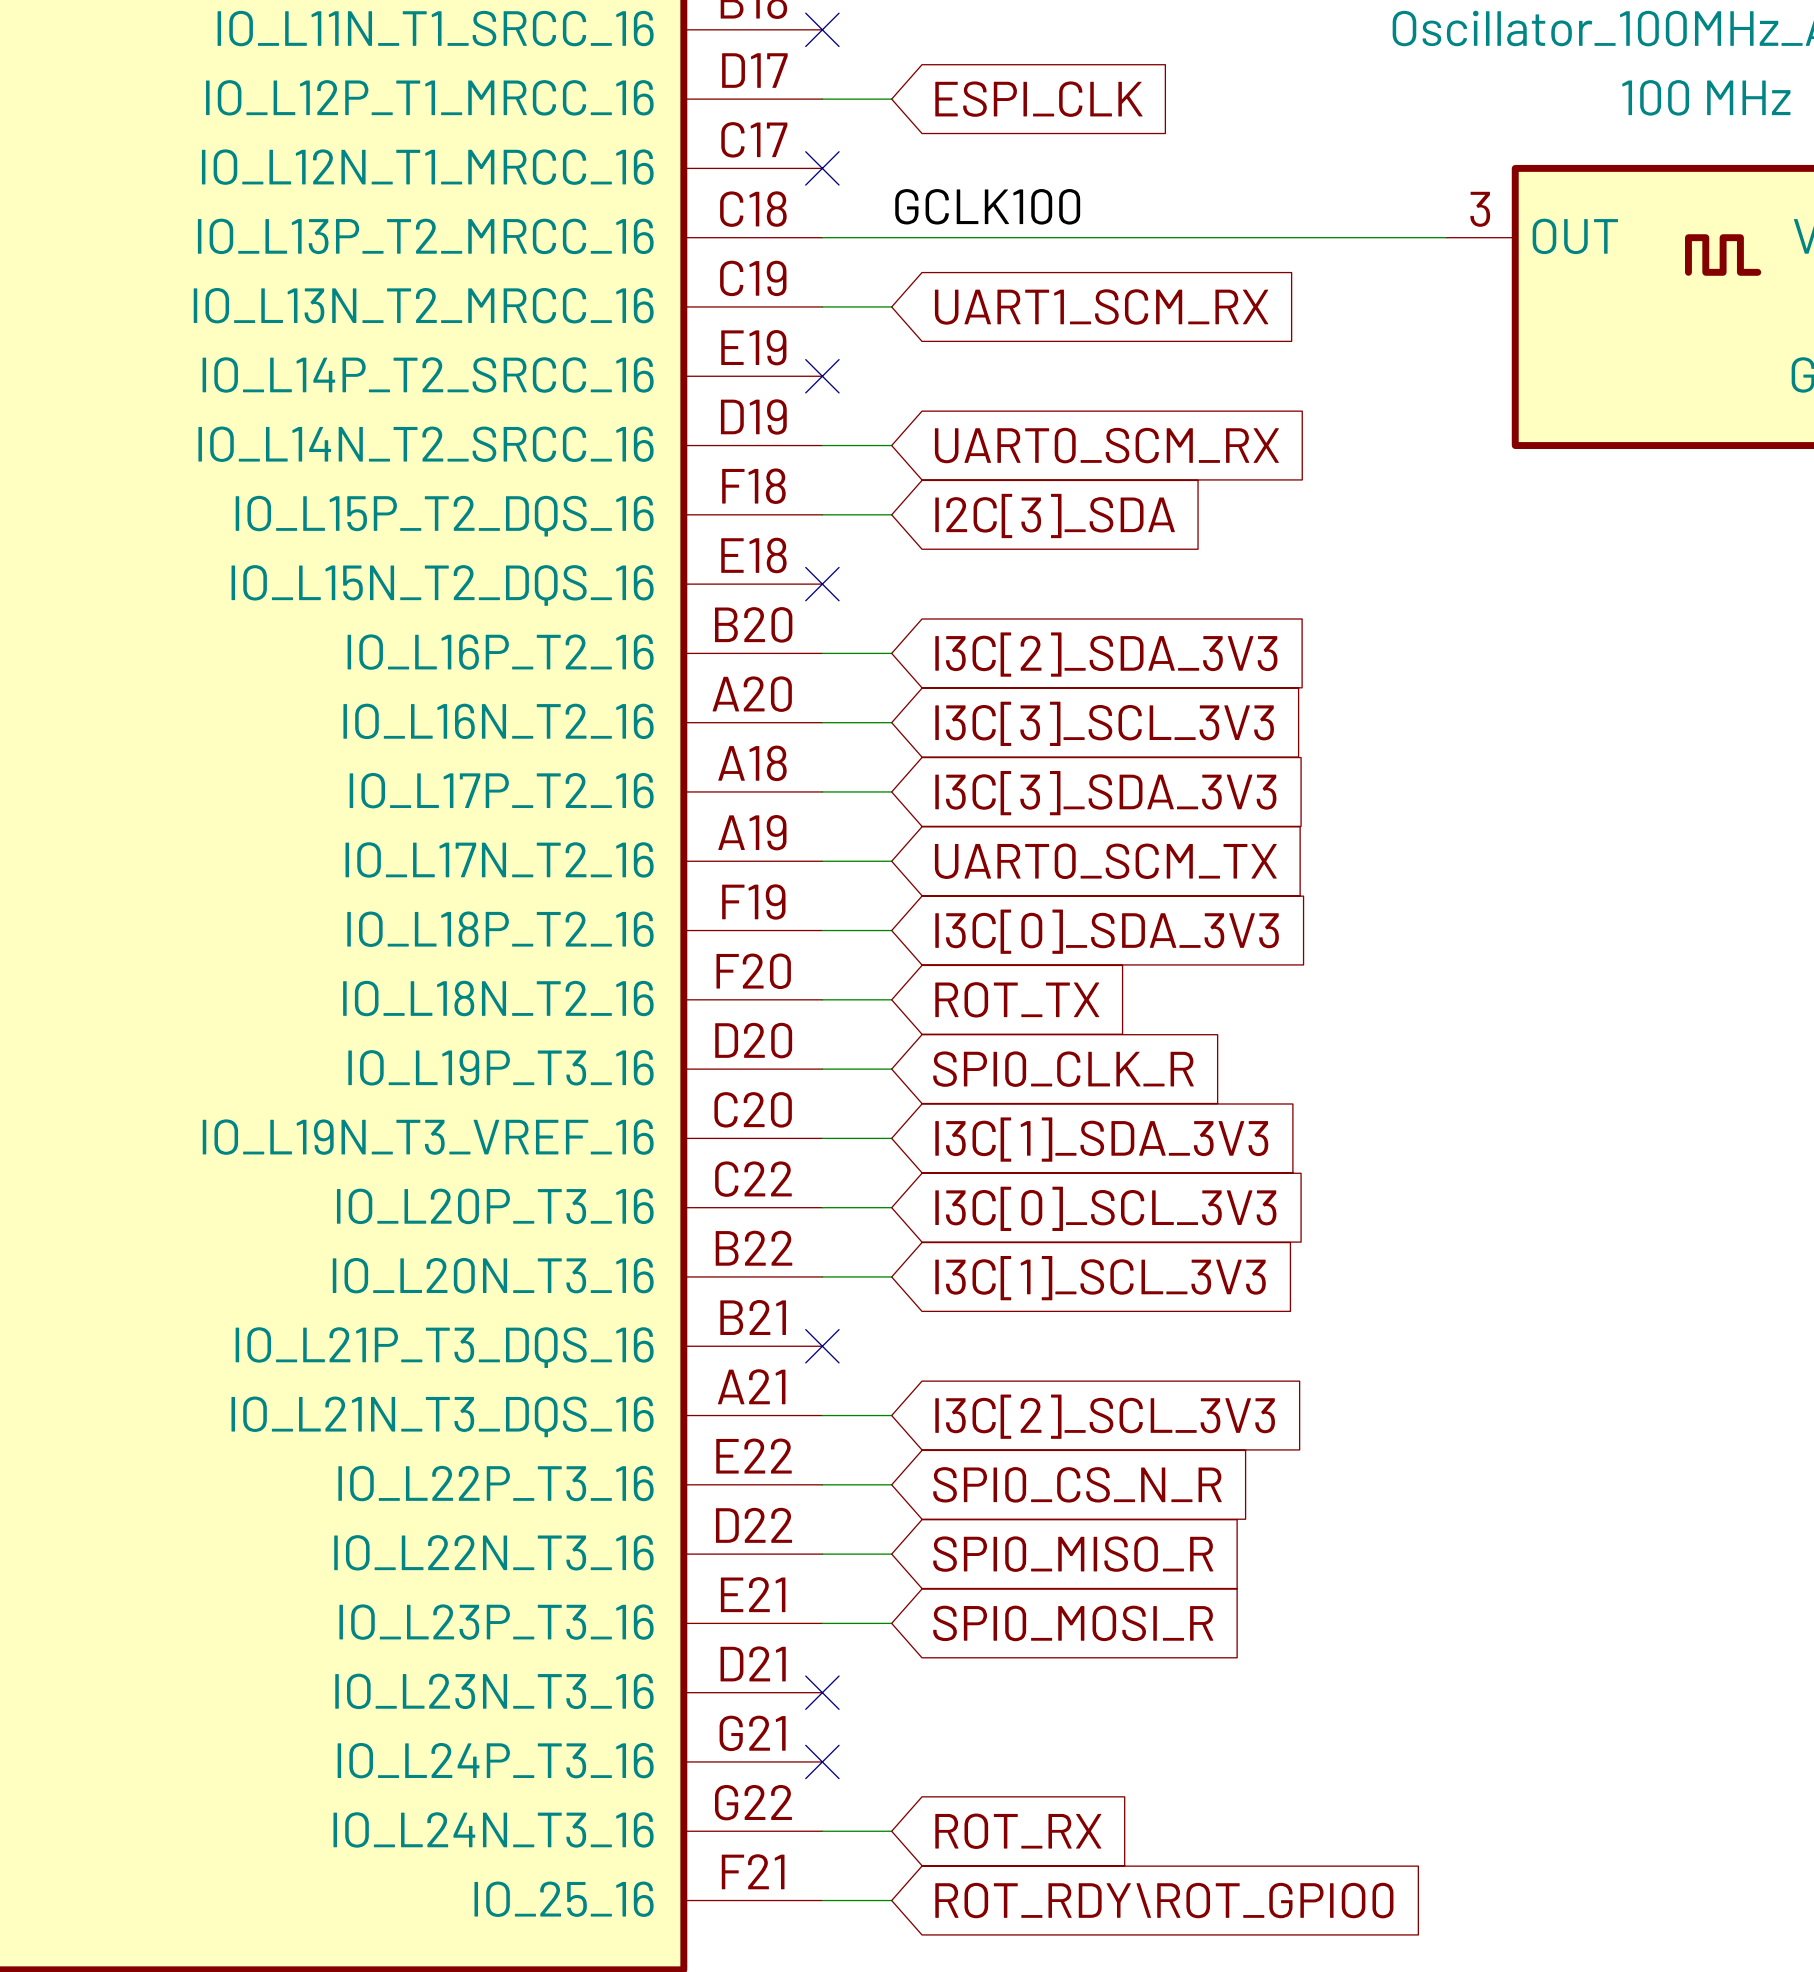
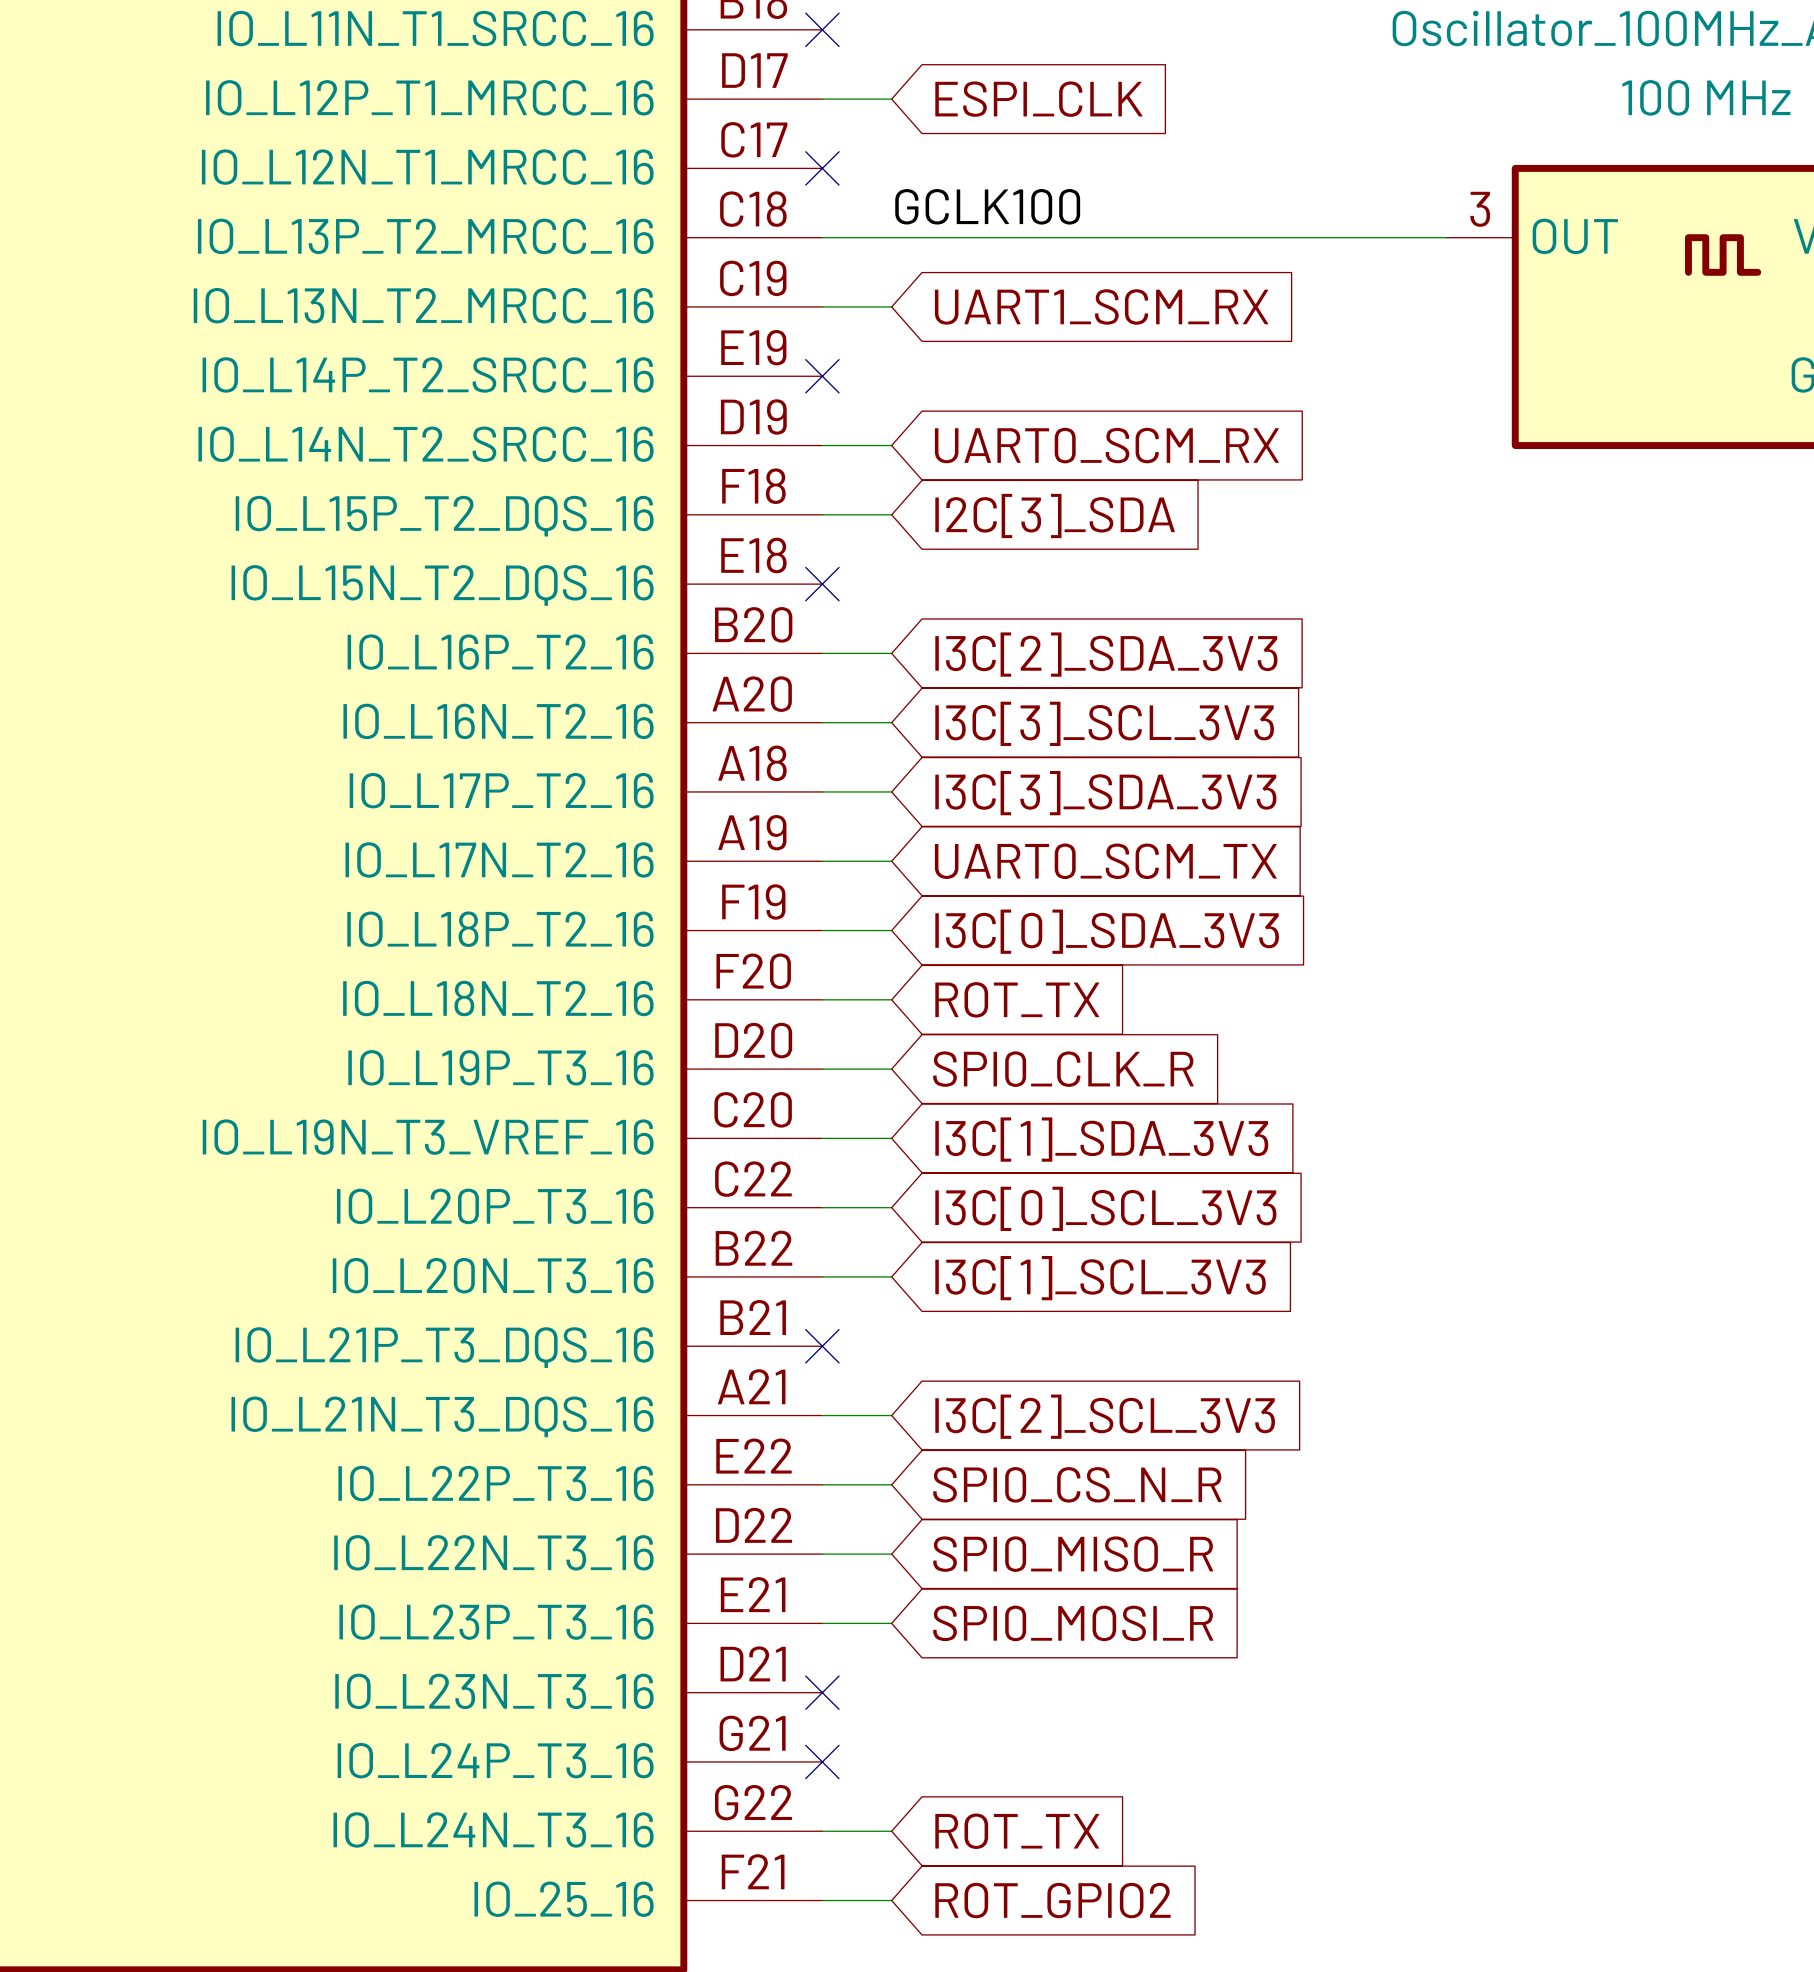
global label: ROT_RX (1018, 1831) -> ROT_TX (1017, 1831)
global label: ROT_RDY\ROT_GPIO0 (1164, 1900) -> ROT_GPIO2 (1053, 1900)

